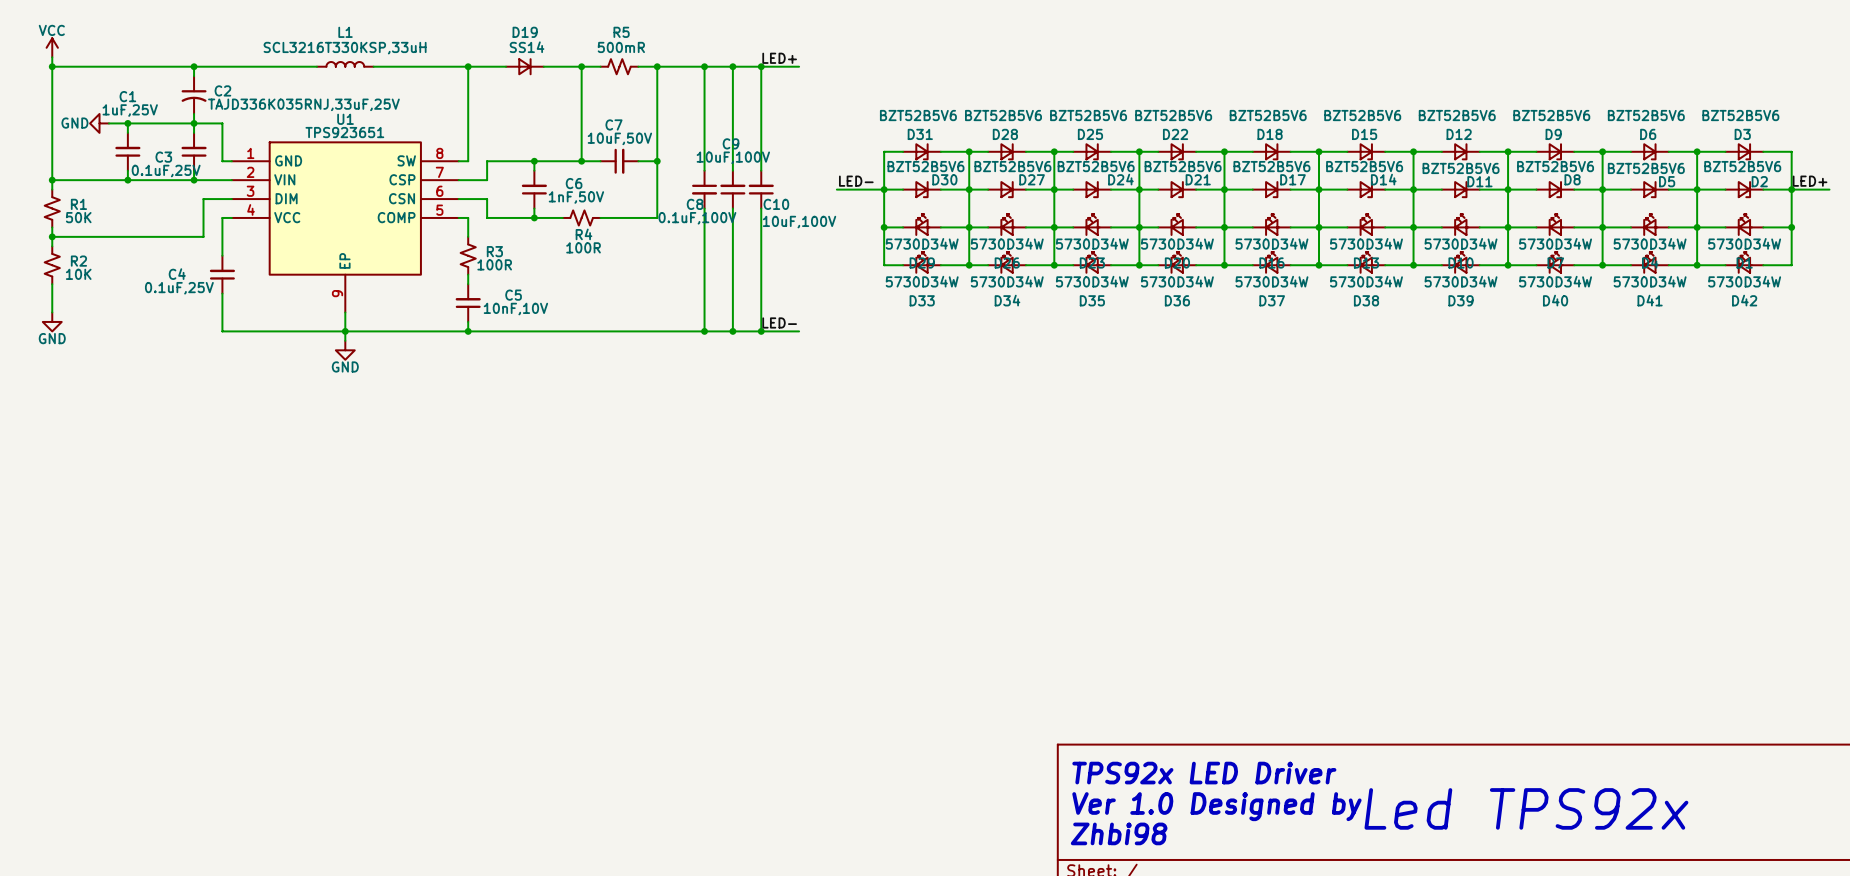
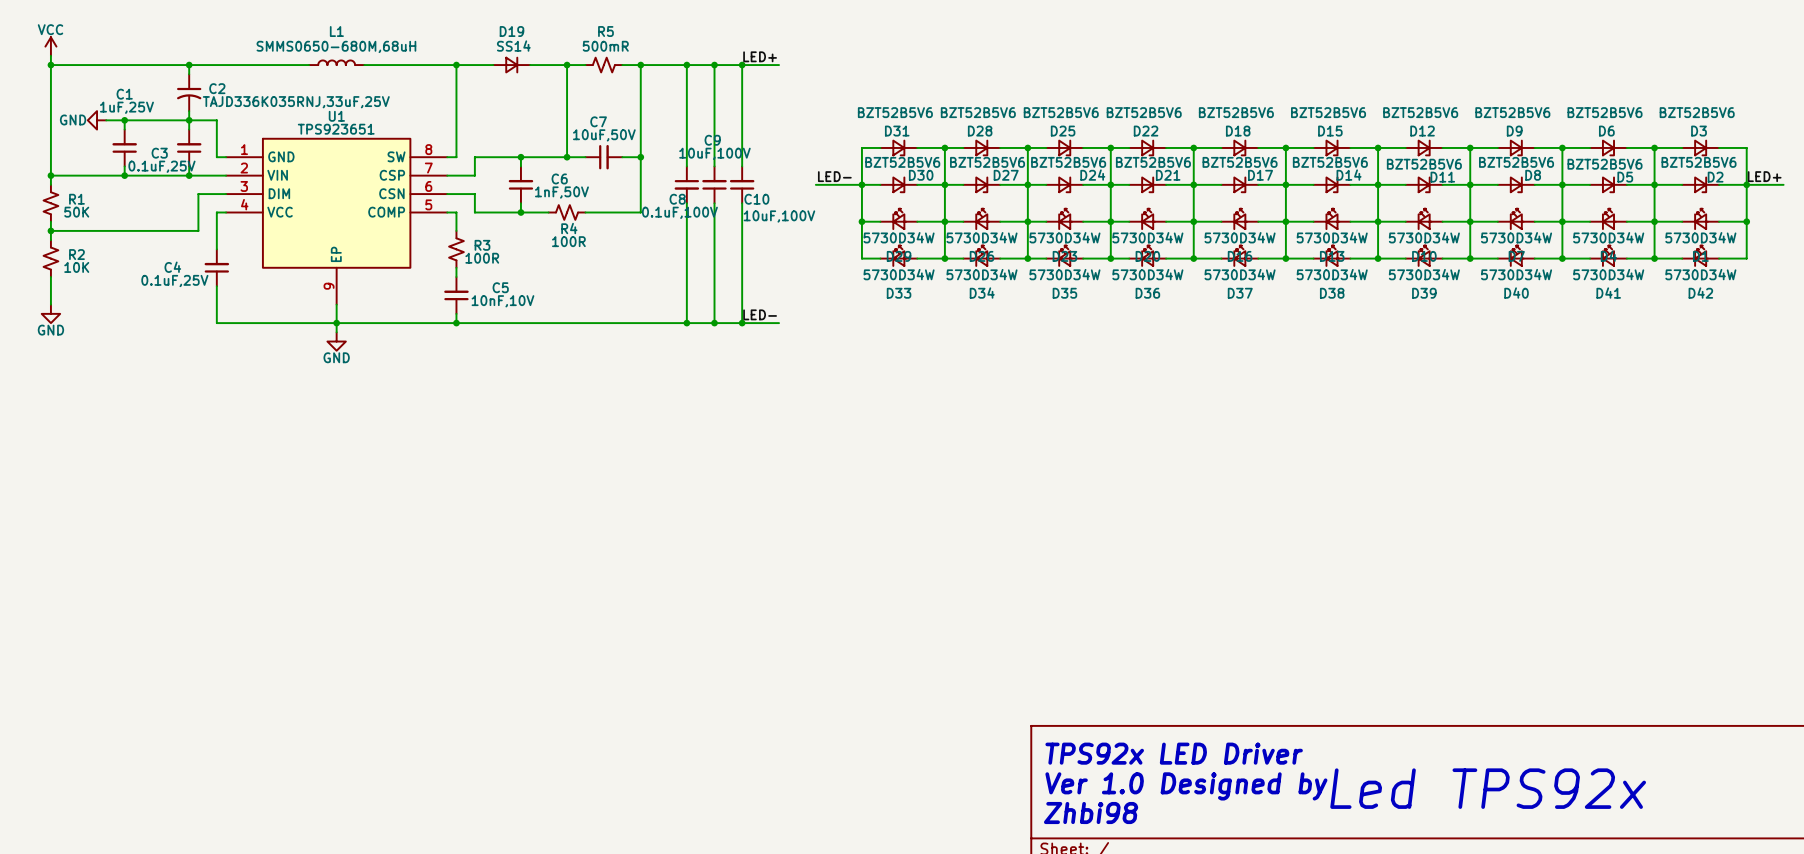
L1 value: SCL3216T330KSP,33uH (345, 48) -> SMMS0650-680M,68uH (336, 46)

